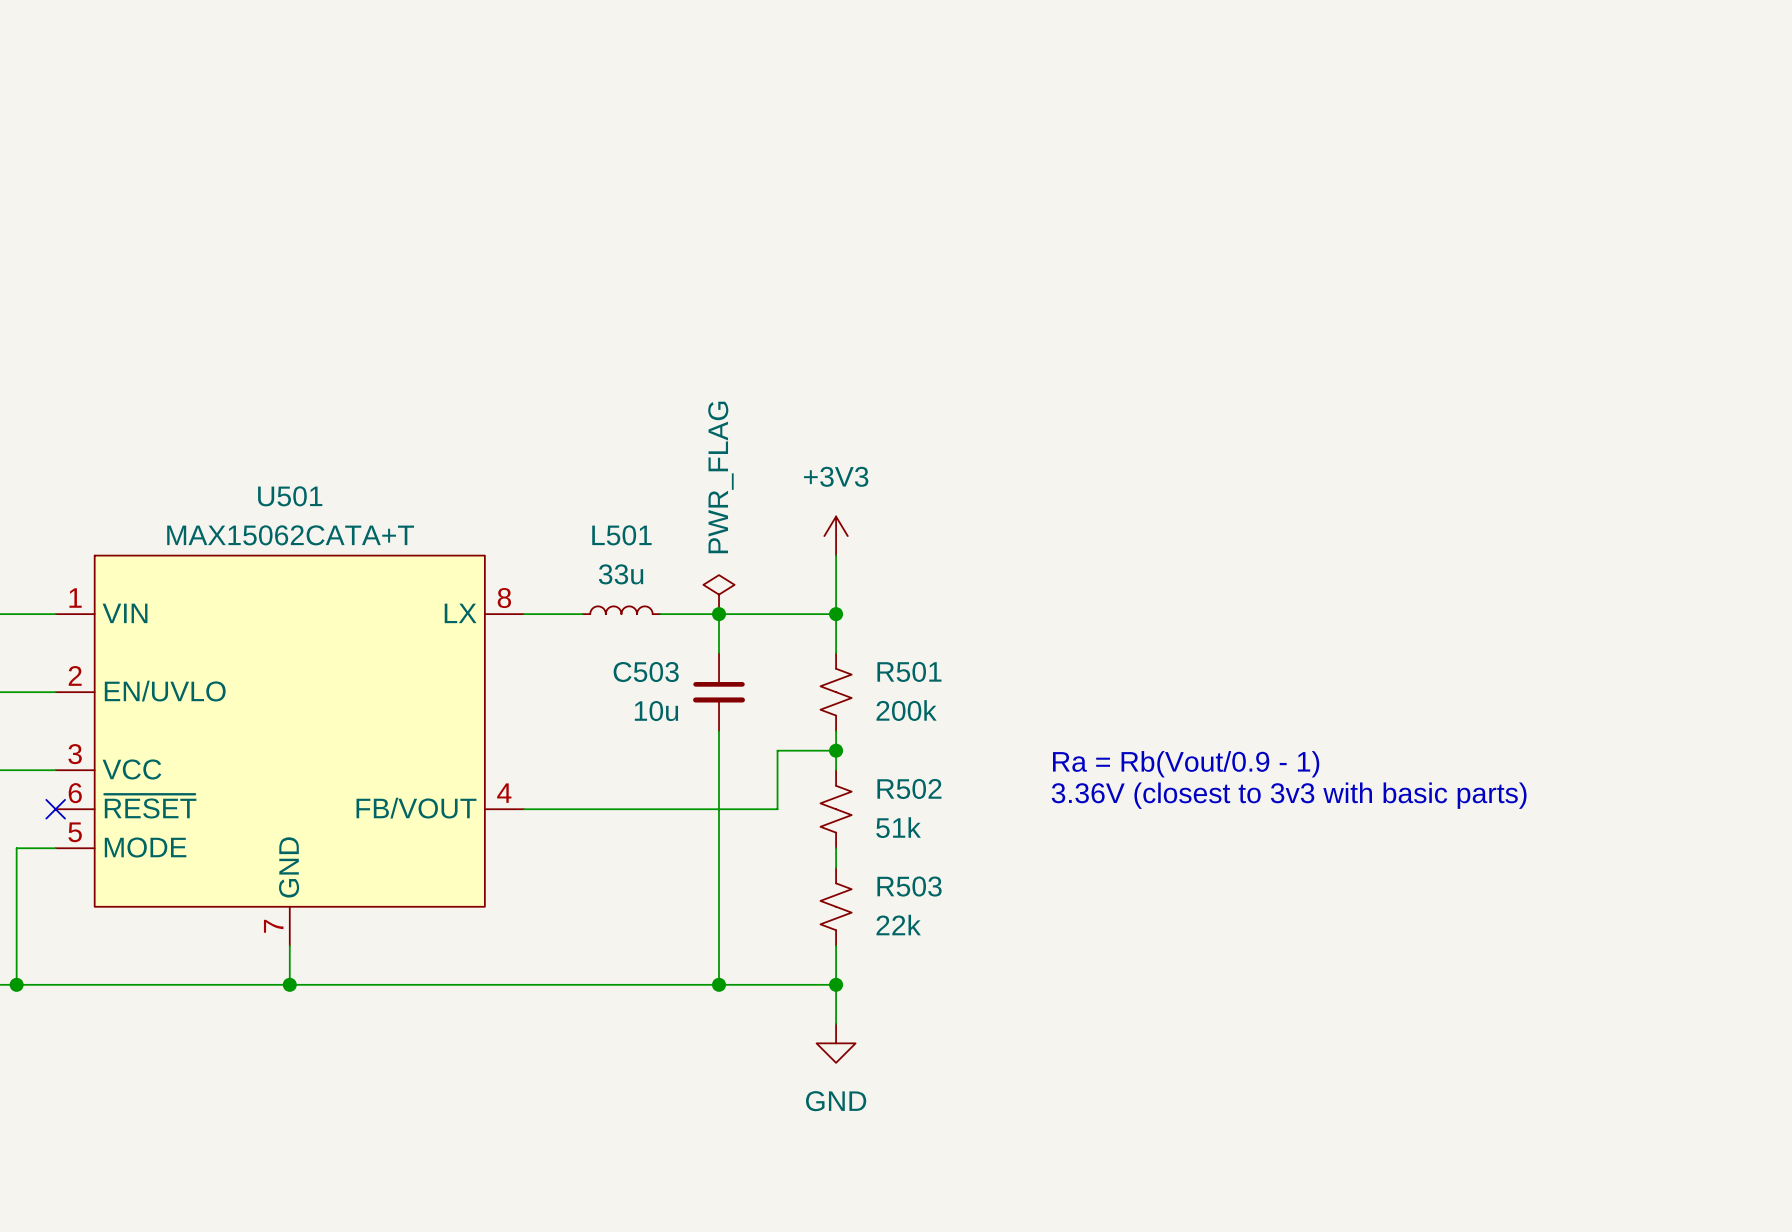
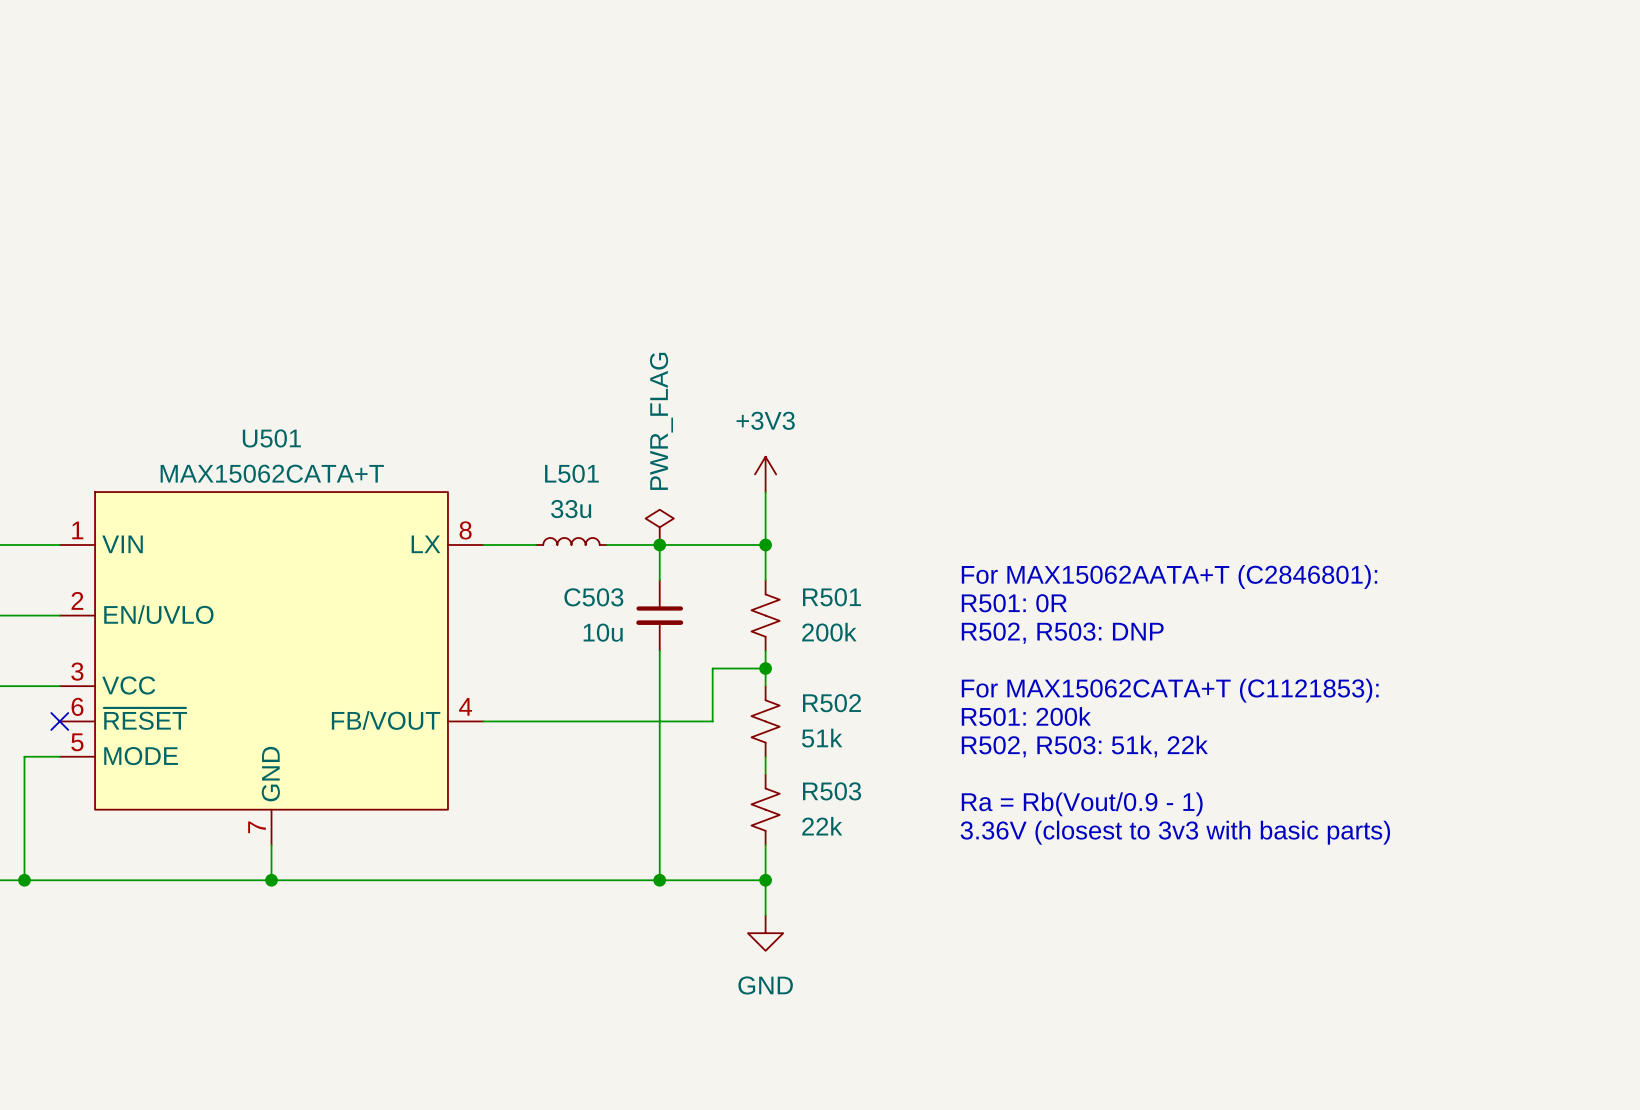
text: none -> For MAX15062AATA+T (C2846801): (1169, 577)
text: none -> R501: 0R (1014, 603)
text: none -> R502, R503: DNP (1062, 633)
text position: Ra = Rb(Vout/0.9 - 1) (1186, 764) -> Ra = Rb(Vout/0.9 - 1) (1082, 804)
text: none -> For MAX15062CATA+T (C1121853): (1170, 690)
text position: 3.36V (closest to 3v3 with basic parts) (1289, 795) -> 3.36V (closest to 3v3 with basic parts) (1175, 832)
text: none -> R501: 200k (1026, 716)
text: none -> R502, R503: 51k, 22k (1084, 746)

